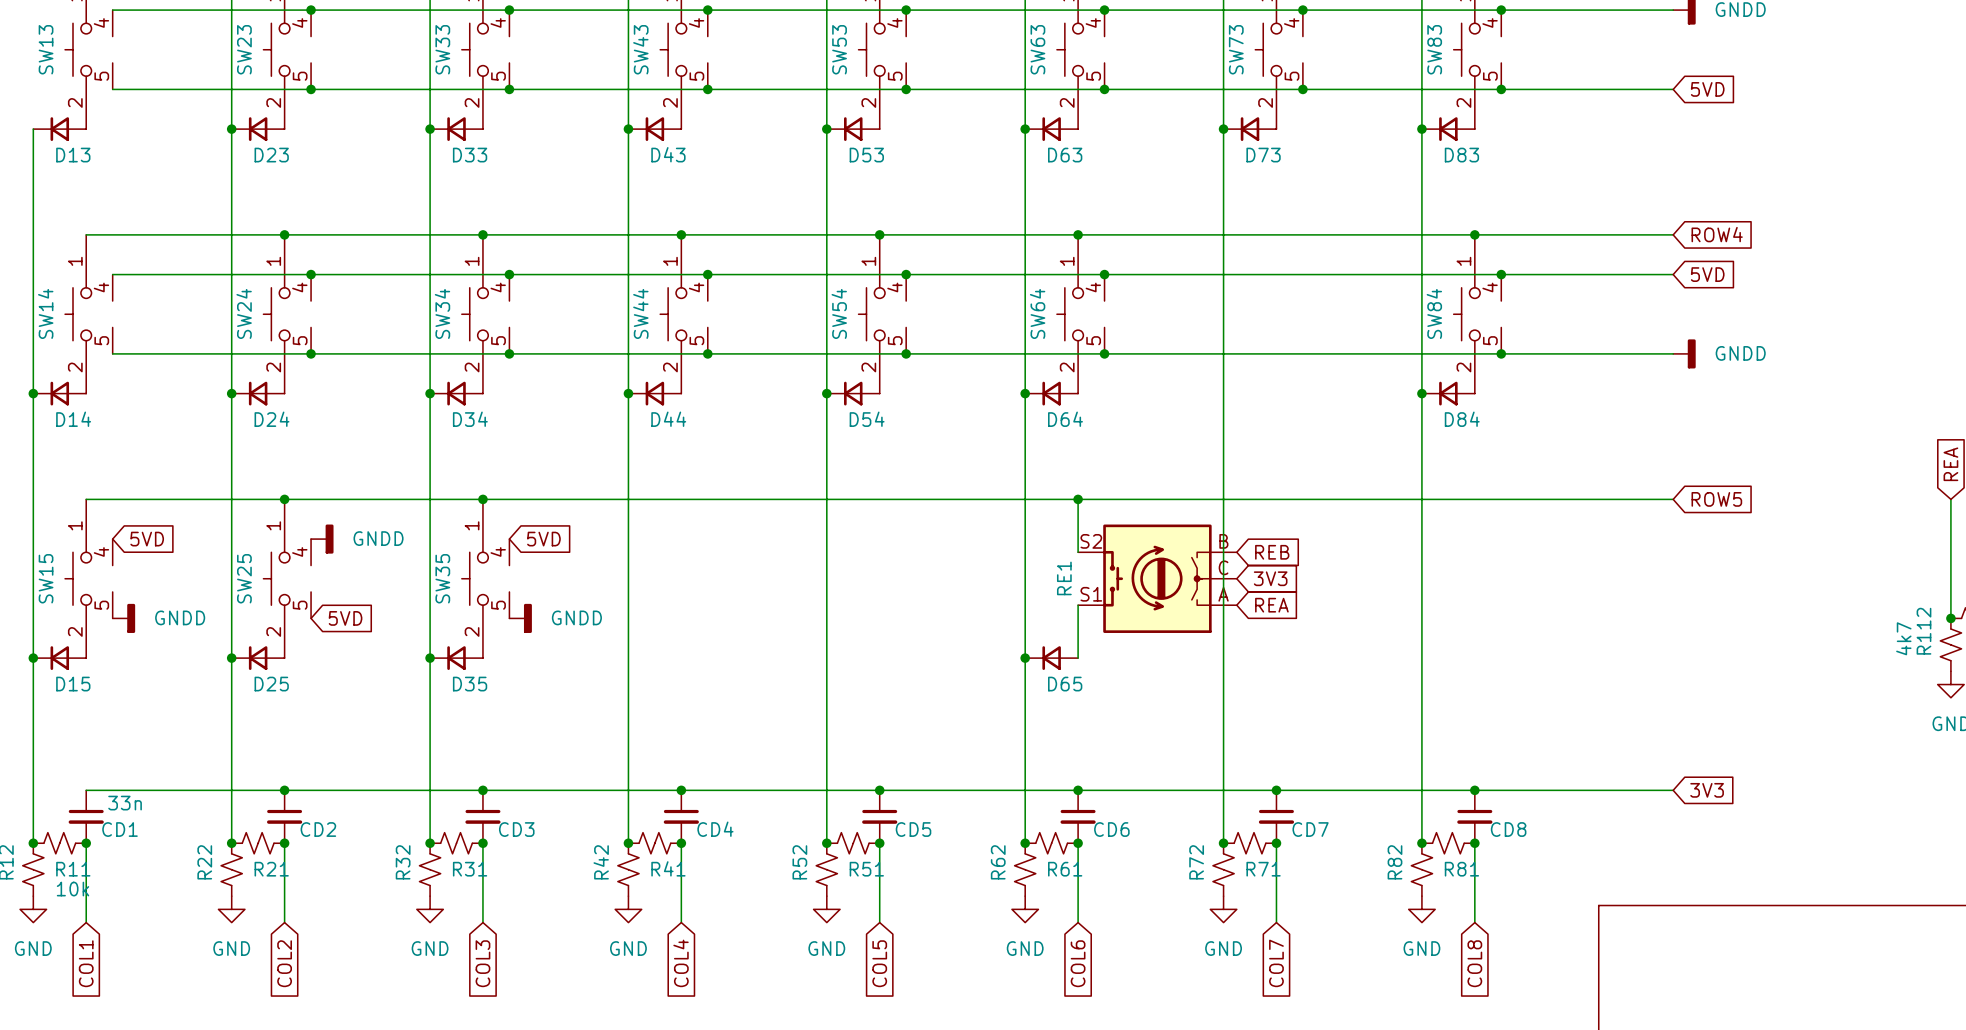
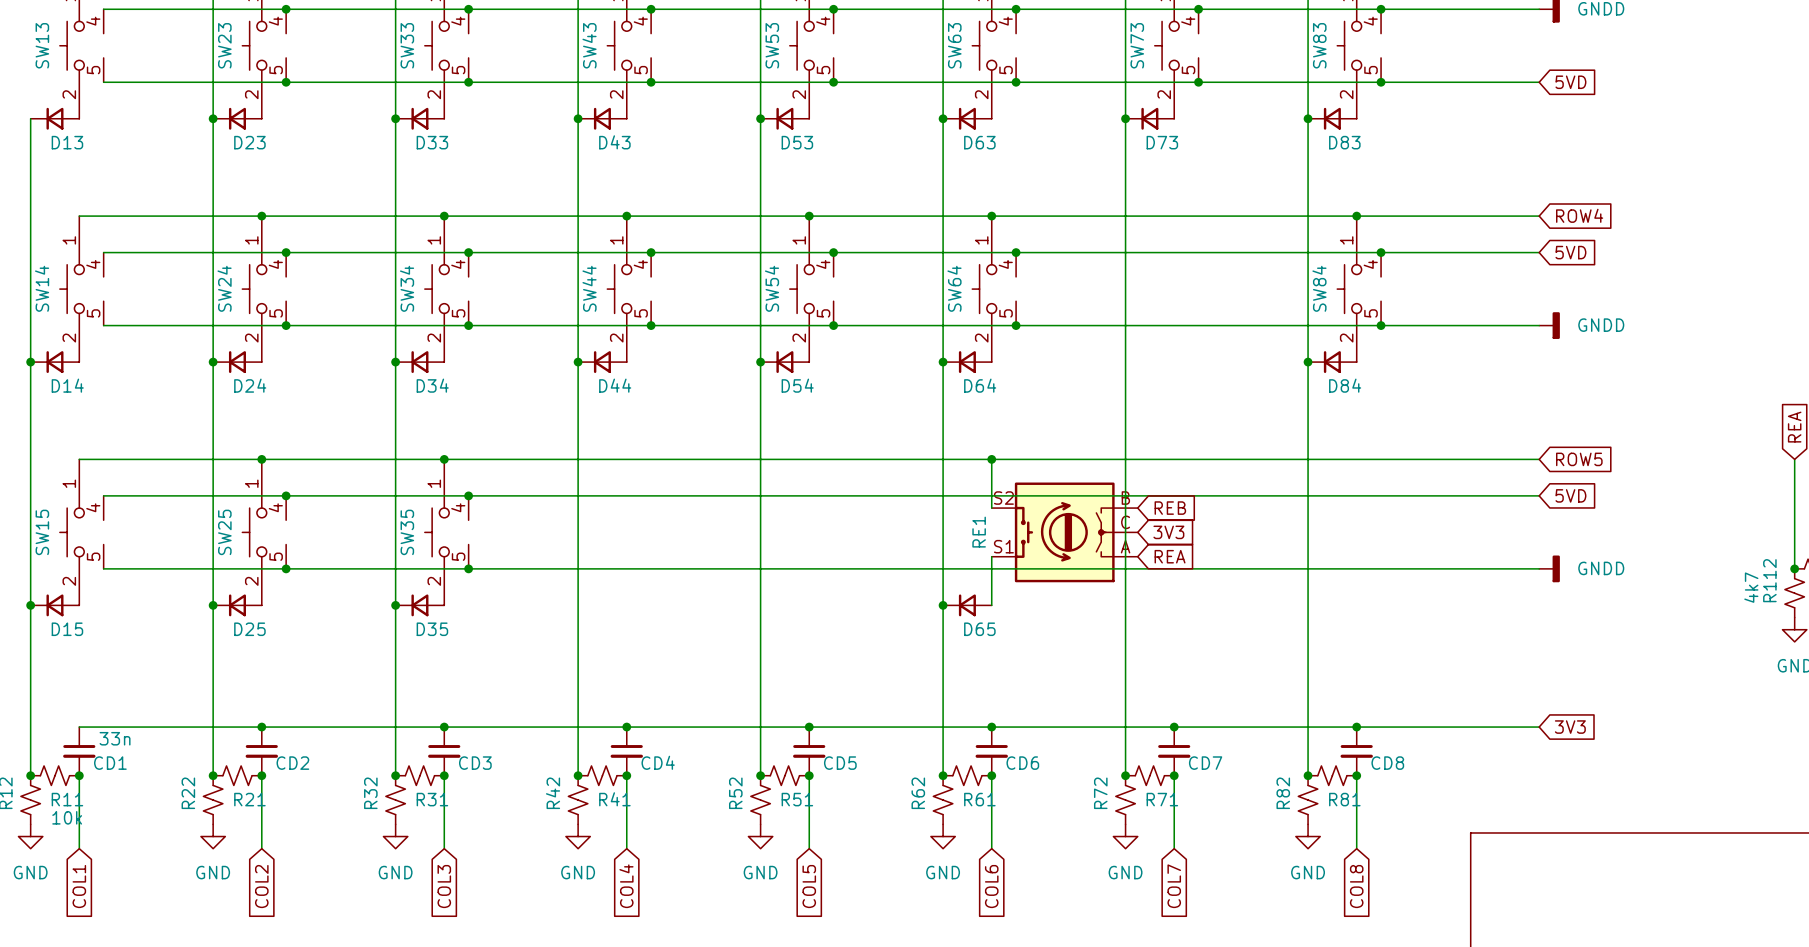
wire: none -> (103, 495) (1539, 495)
global label: 5VD (147, 539) -> none
junction: none -> (286, 495)
power symbol: GNDD (322, 539) -> none
junction: none -> (468, 495)
global label: 5VD (543, 539) -> none
global label: none -> 5VD (1570, 495)
wire: none -> (103, 568) (1539, 568)
power symbol: GNDD (123, 618) -> none
junction: none -> (286, 568)
global label: 5VD (345, 618) -> none
junction: none -> (468, 568)
power symbol: GNDD (520, 618) -> none
power symbol: none -> GNDD (1549, 568)

